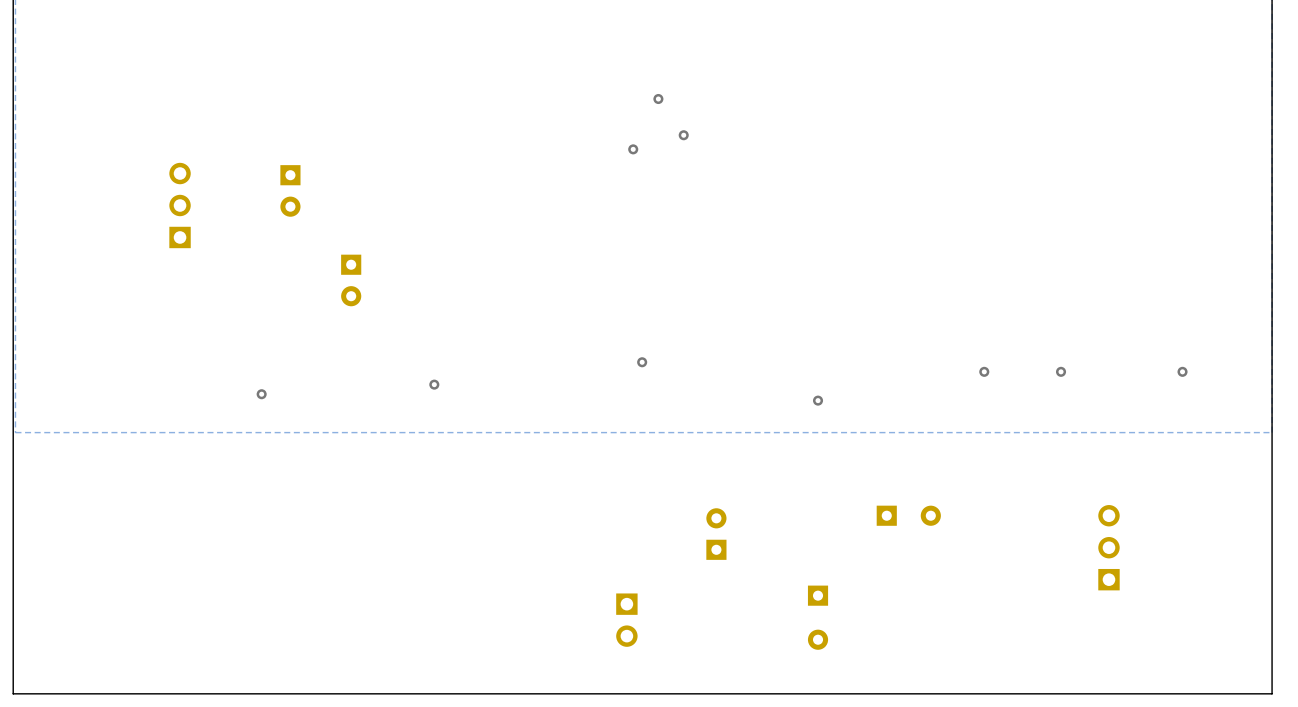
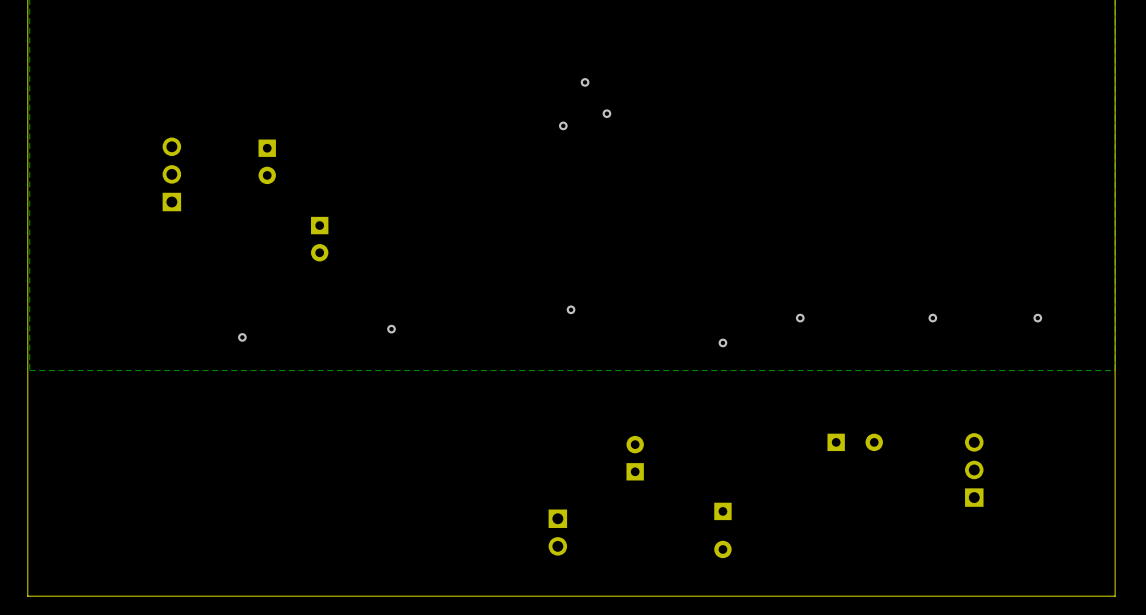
via: none -> (800, 318)
via: (984, 371) -> none
part position: (908, 515) -> (855, 442)

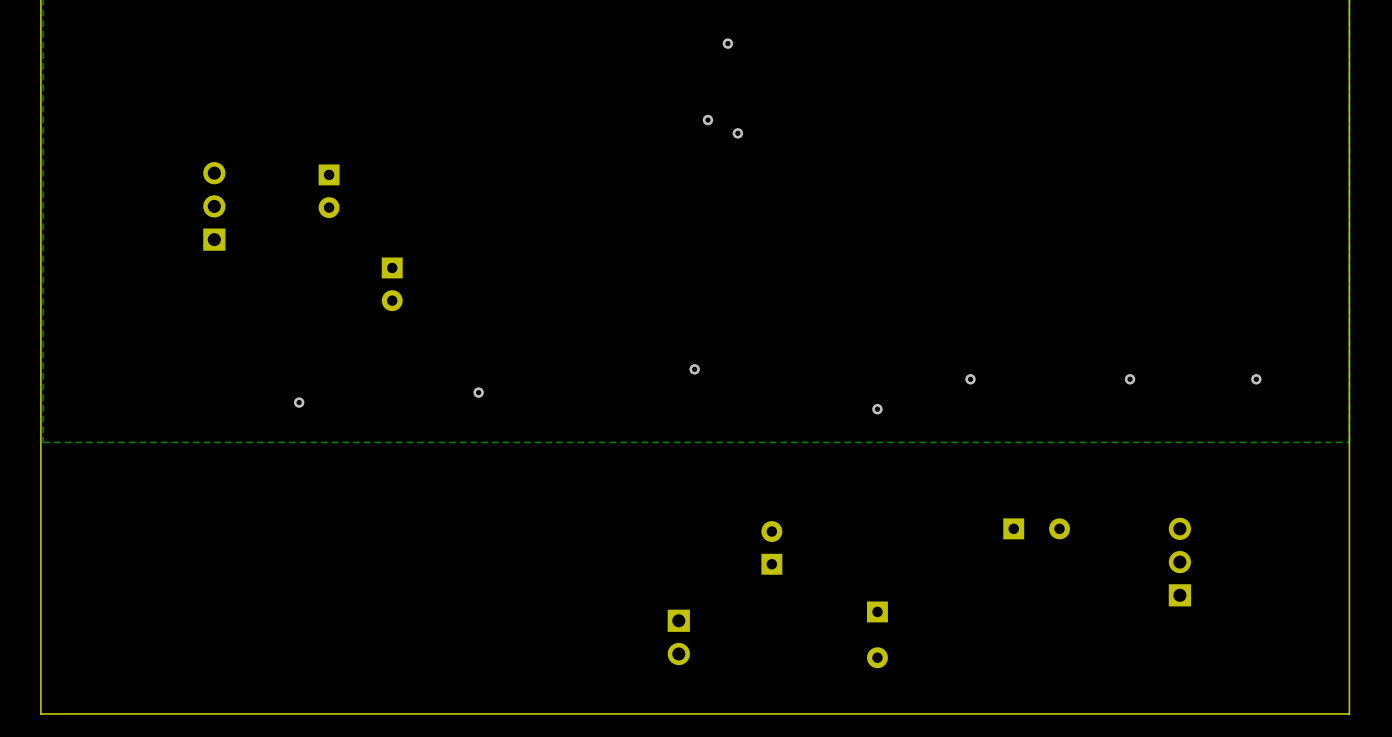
via: none -> (727, 43)
via: (585, 82) -> none
via: none -> (707, 120)
via: (563, 125) -> none

